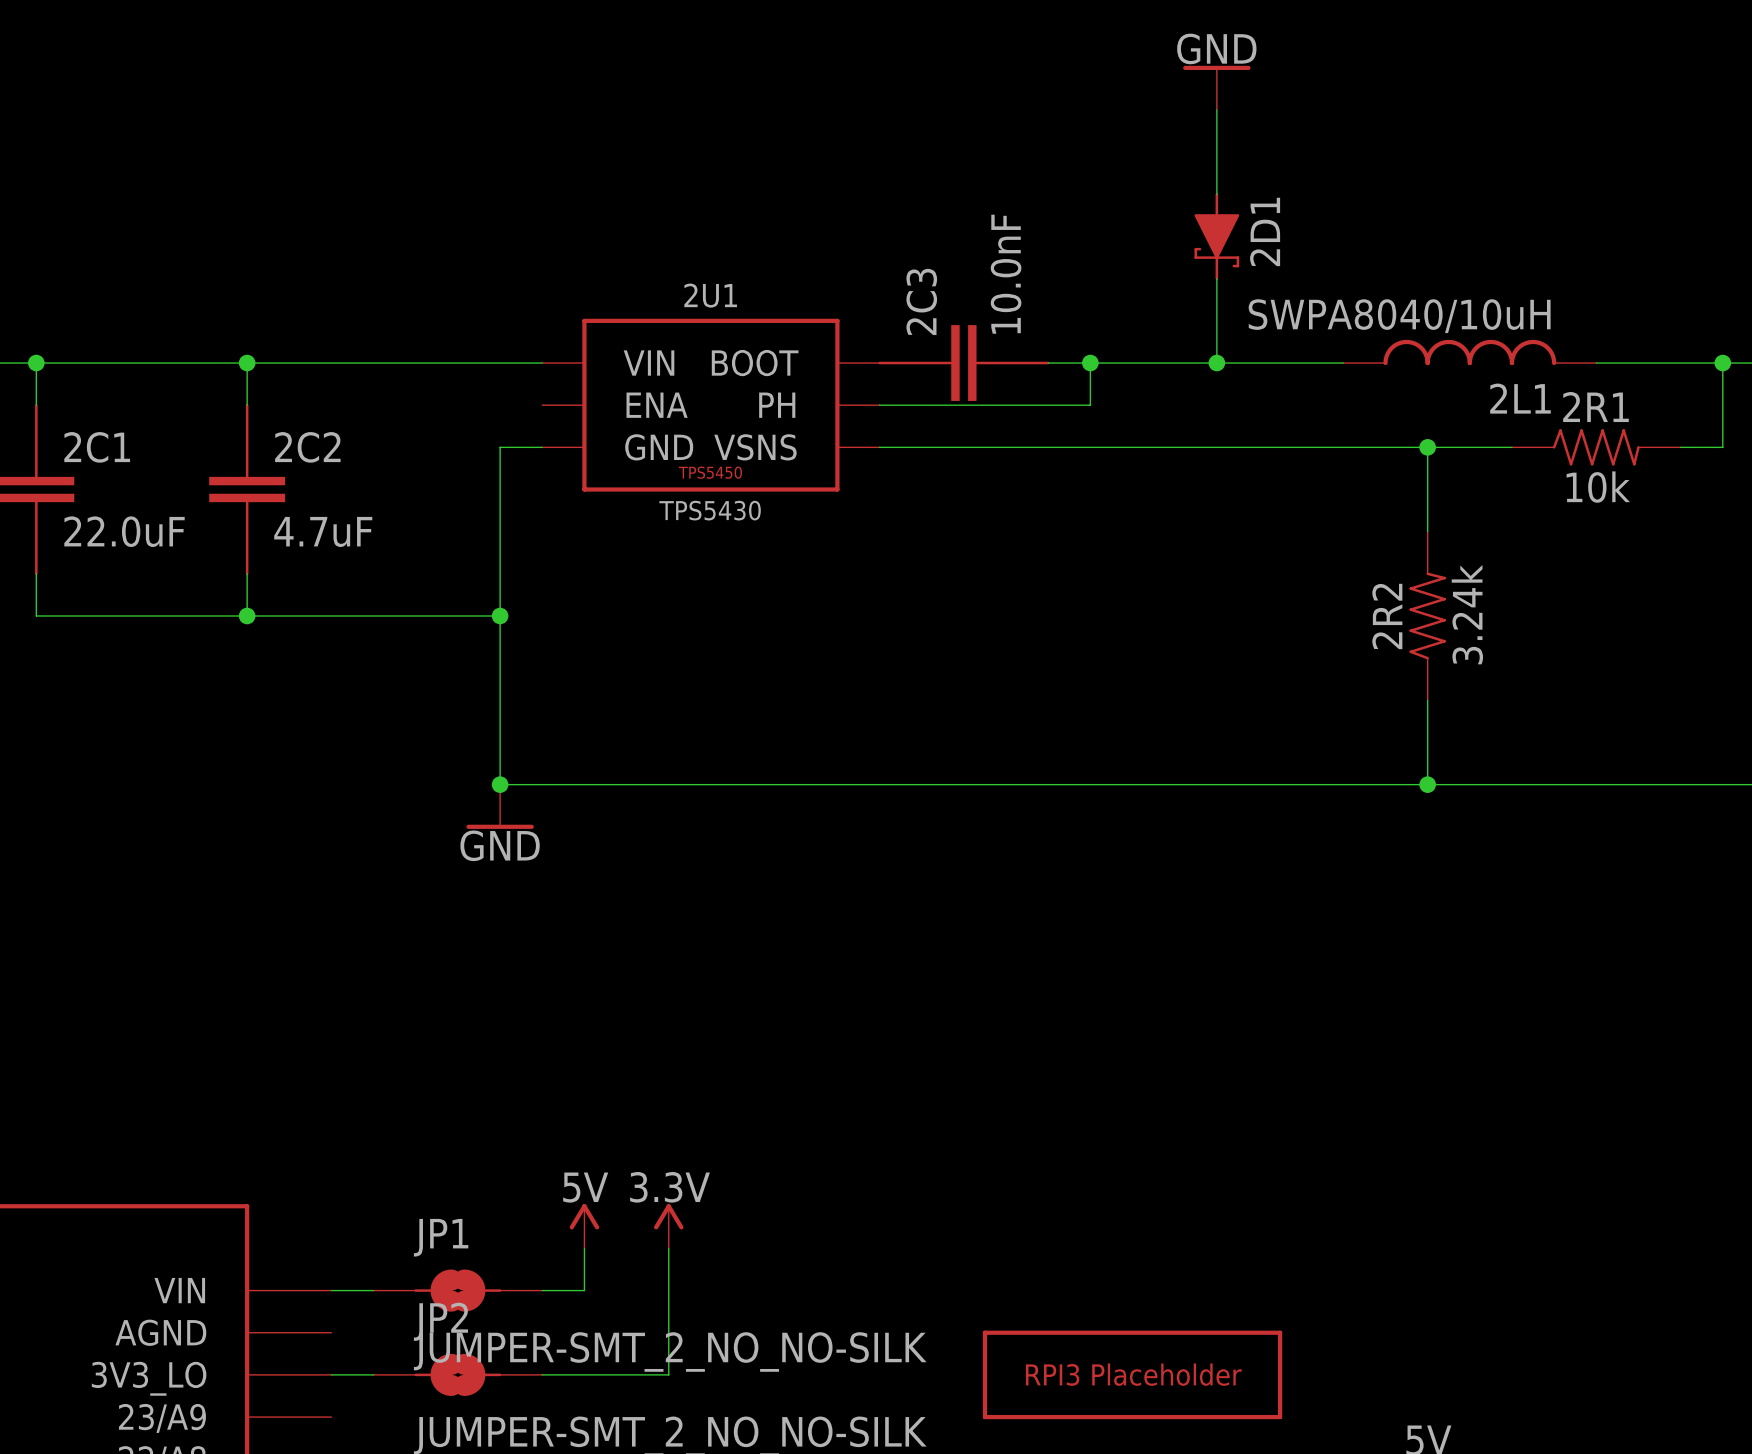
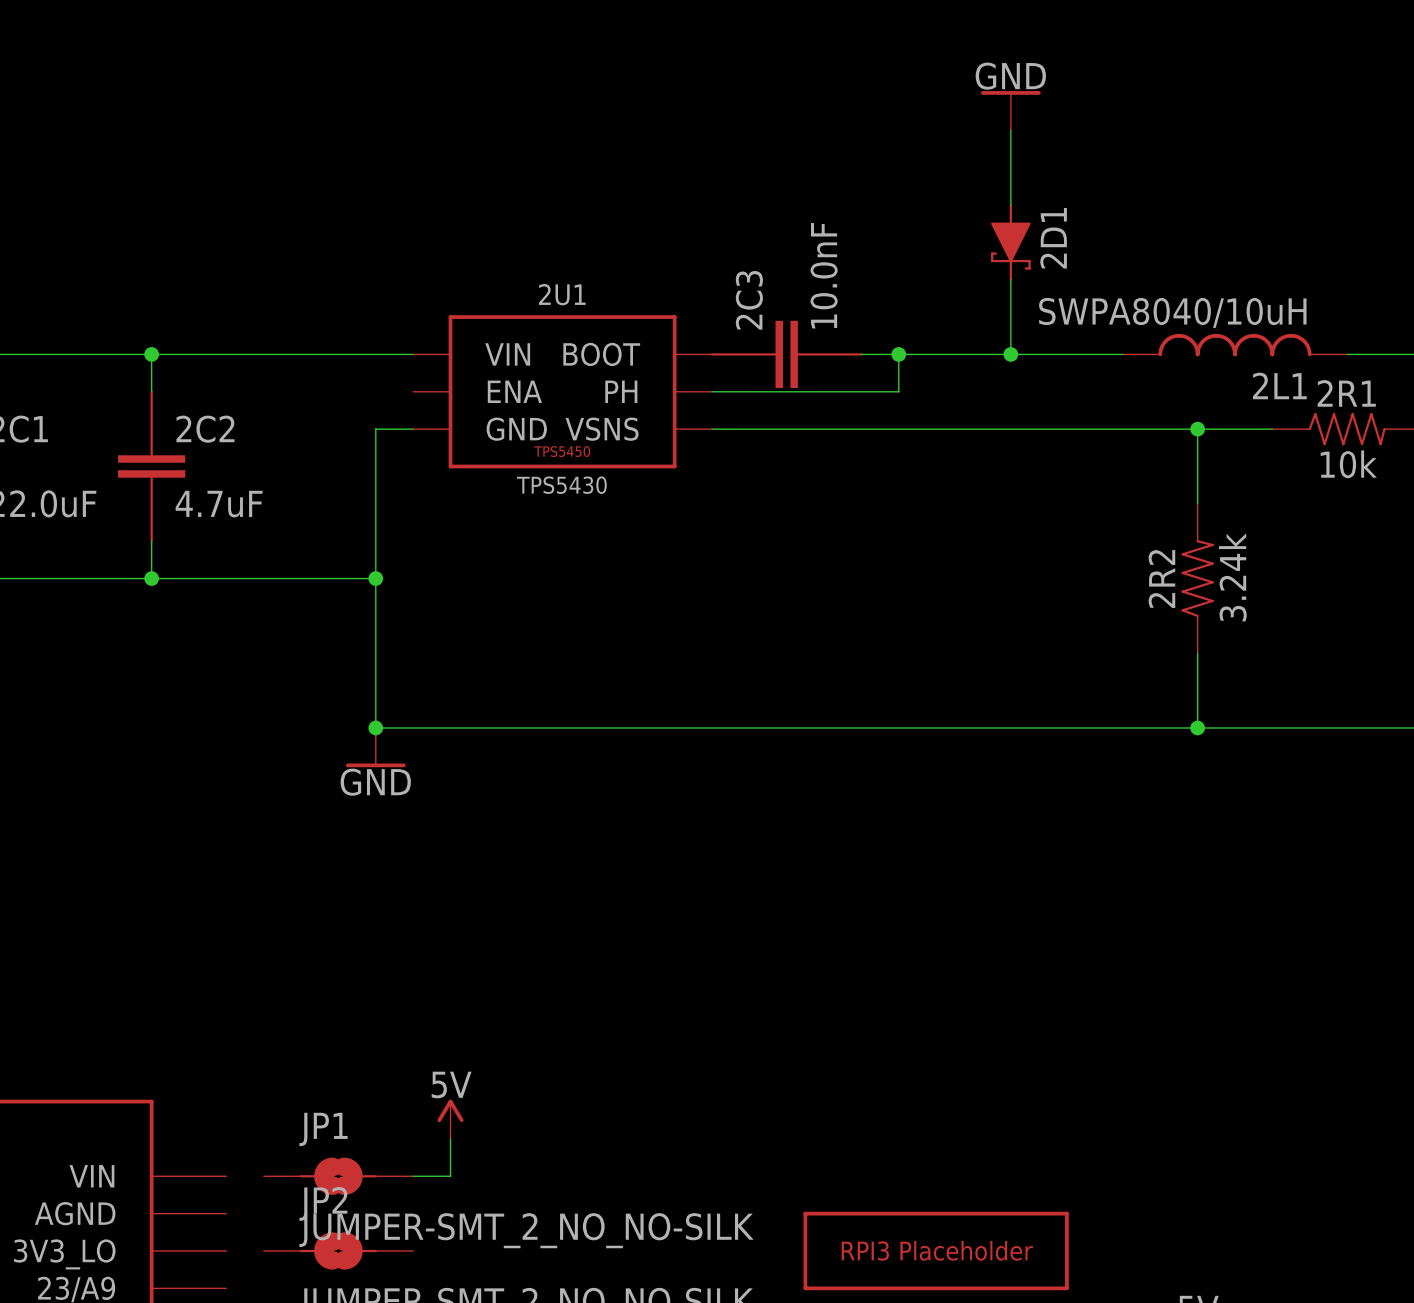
power symbol: 3.3V (668, 1226) -> none
wire: (668, 1248) (668, 1374) (542, 1374) -> none
wire: (331, 1290) (373, 1290) -> none
wire: (331, 1374) (373, 1374) -> none

